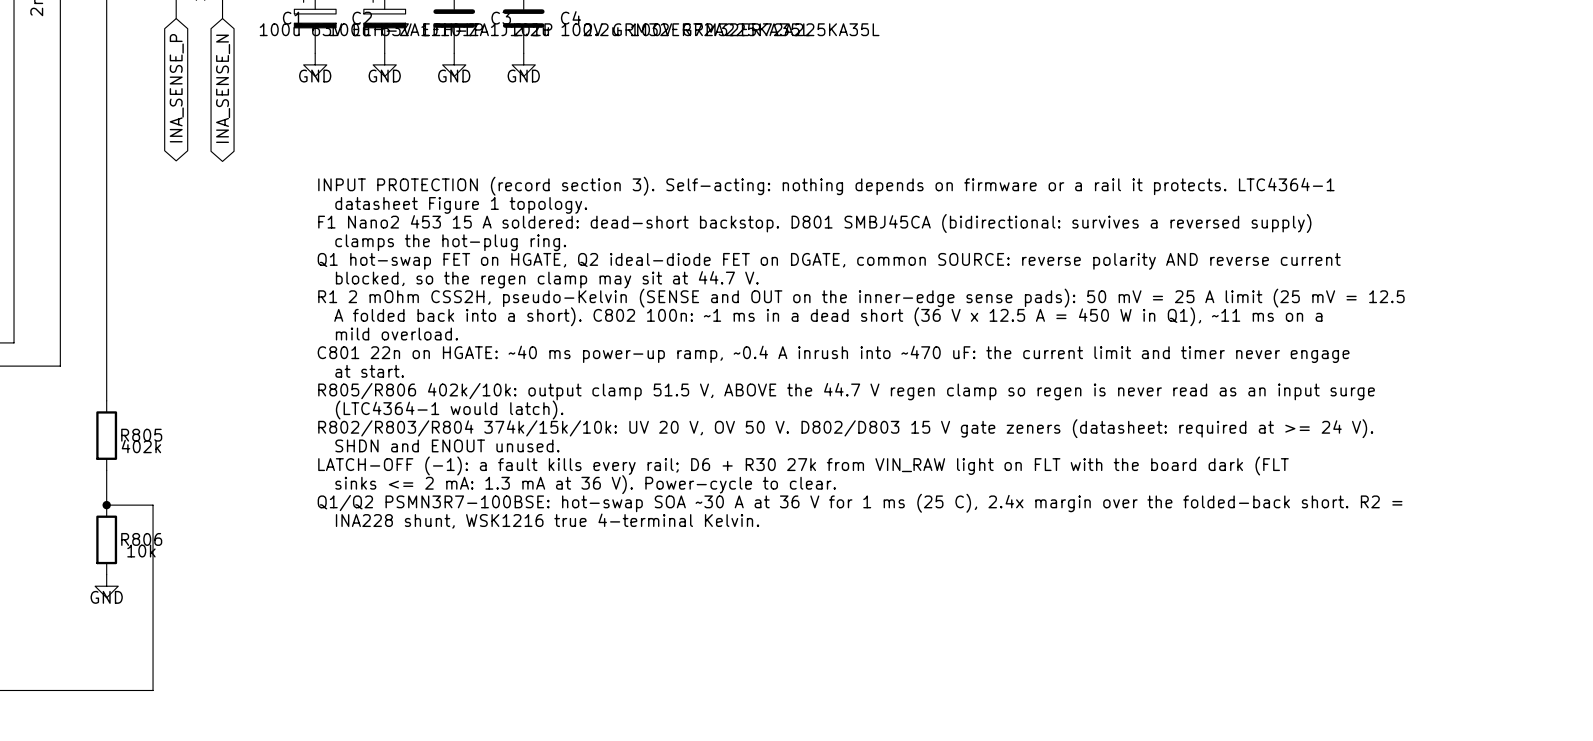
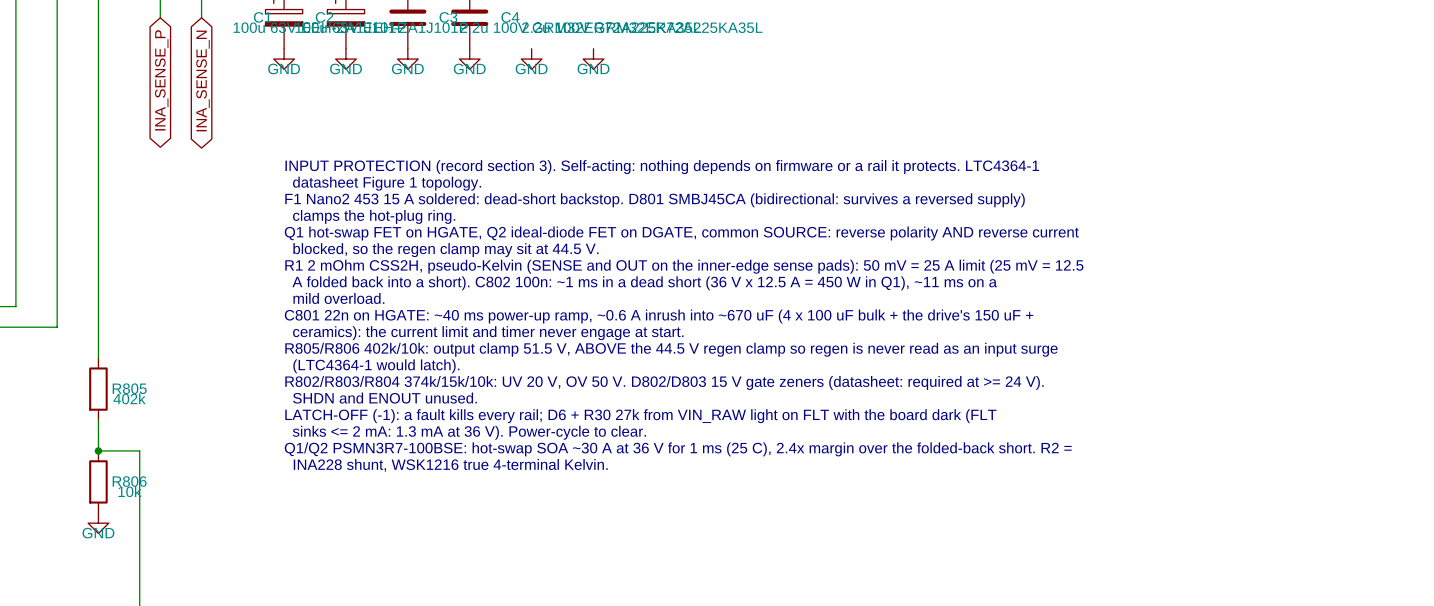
power symbol: none -> GND (531, 59)
power symbol: none -> GND (593, 59)
text: blocked, so the regen clamp may sit at 44.7 V. (547, 279) -> blocked, so the regen clamp may sit at 44.5 V. (445, 250)
text: C801 22n on HGATE: ~40 ms power-up ramp, ~0.4 A inrush into ~470 uF: the current limit and timer never engage (833, 354) -> C801 22n on HGATE: ~40 ms power-up ramp, ~0.6 A inrush into ~670 uF (4 x 100 uF bulk + the drive's 150 uF + (659, 316)
text: at start. (369, 371) -> ceramics): the current limit and timer never engage at start. (488, 333)
text: R805/R806 402k/10k: output clamp 51.5 V, ABOVE the 44.7 V regen clamp so regen is never read as an input surge (846, 391) -> R805/R806 402k/10k: output clamp 51.5 V, ABOVE the 44.5 V regen clamp so regen is never read as an input surge (671, 349)

